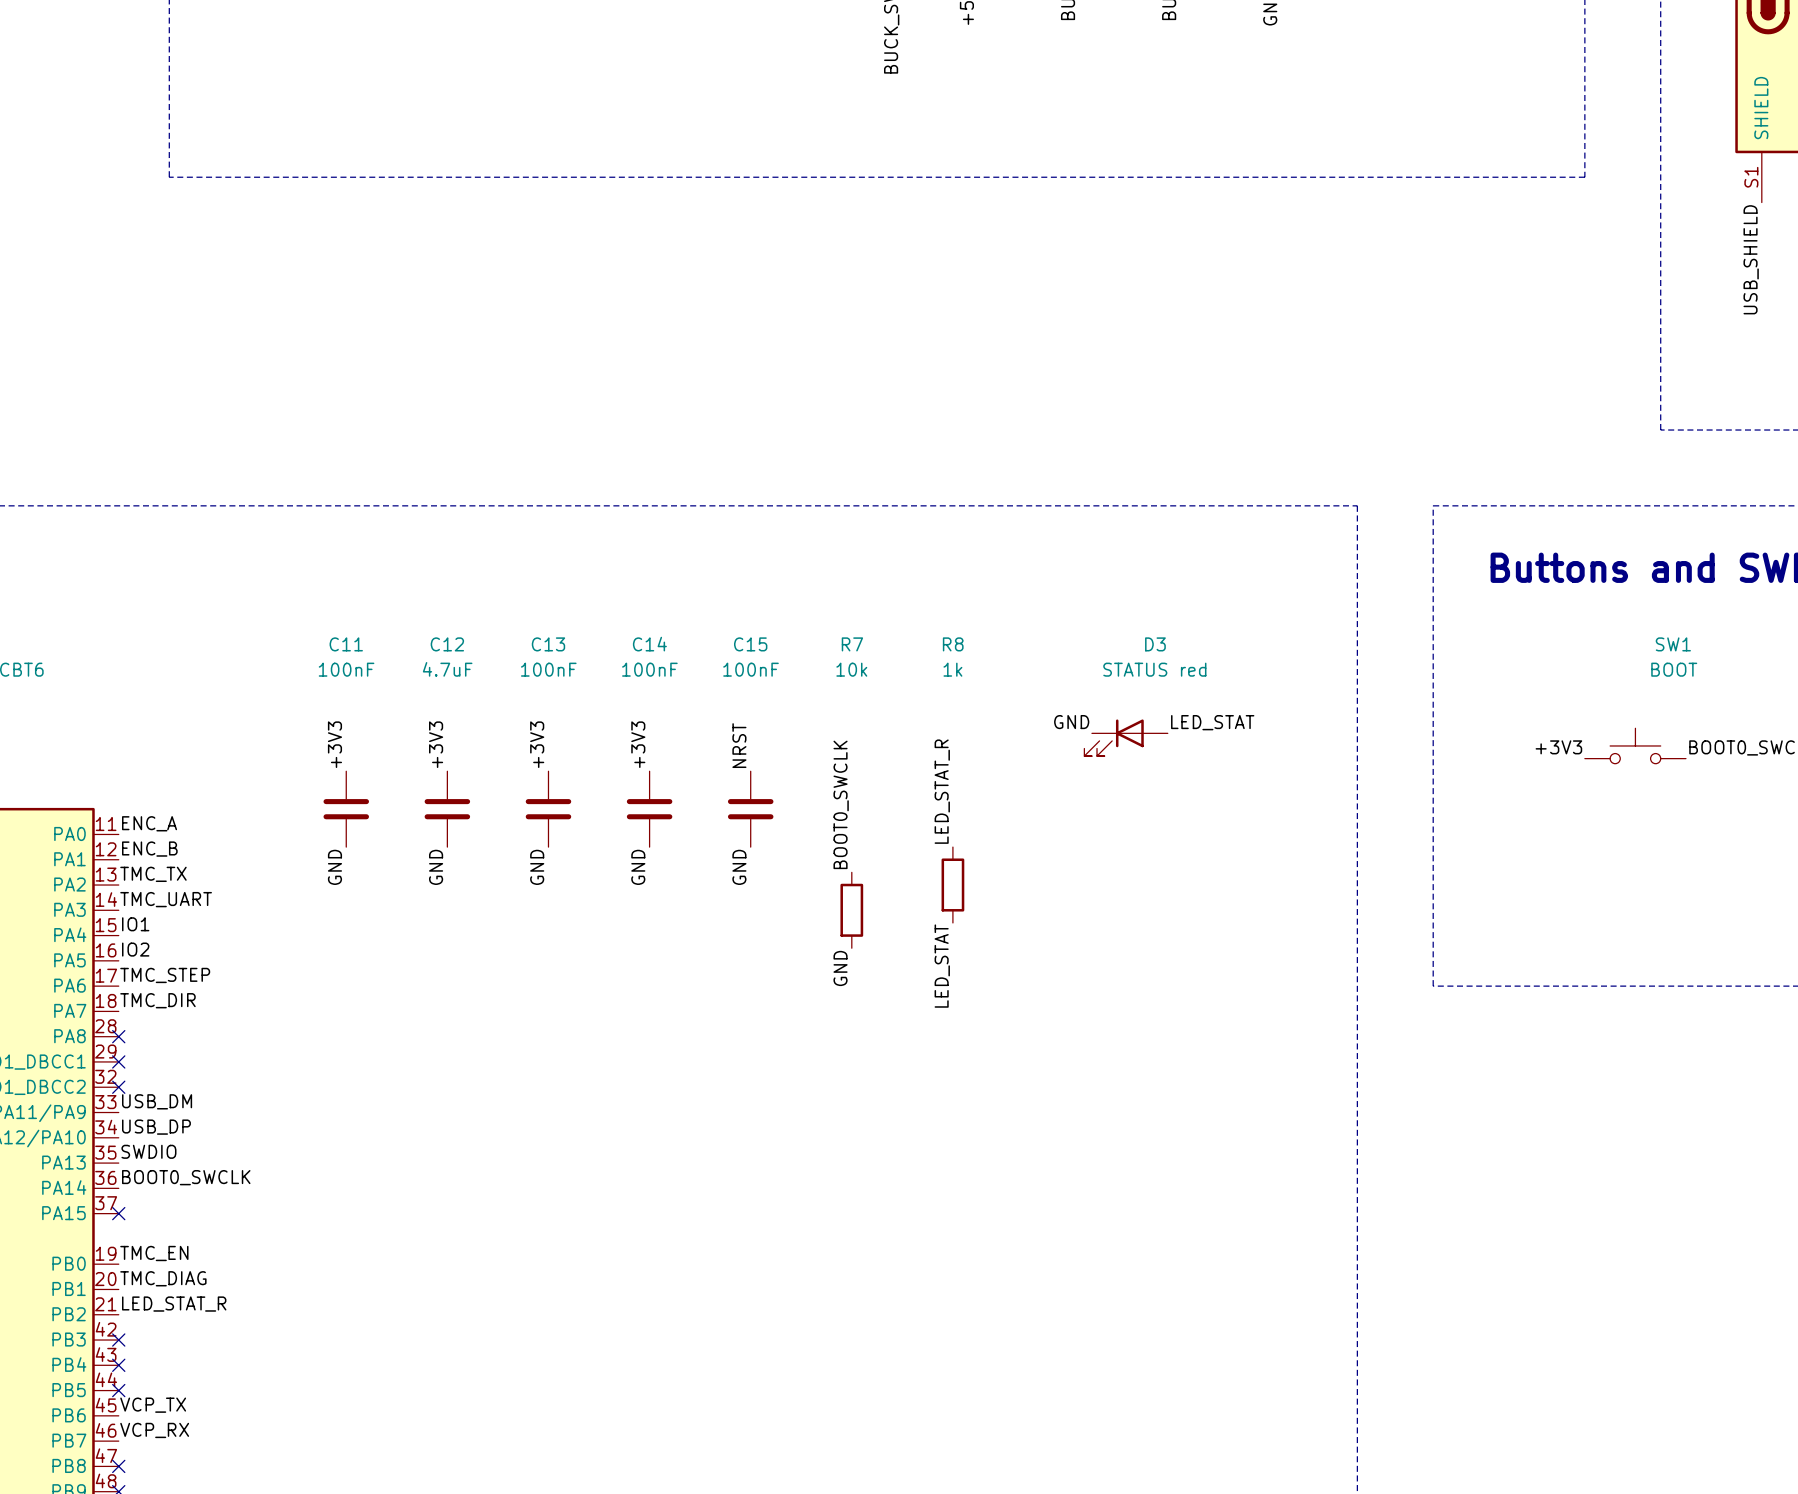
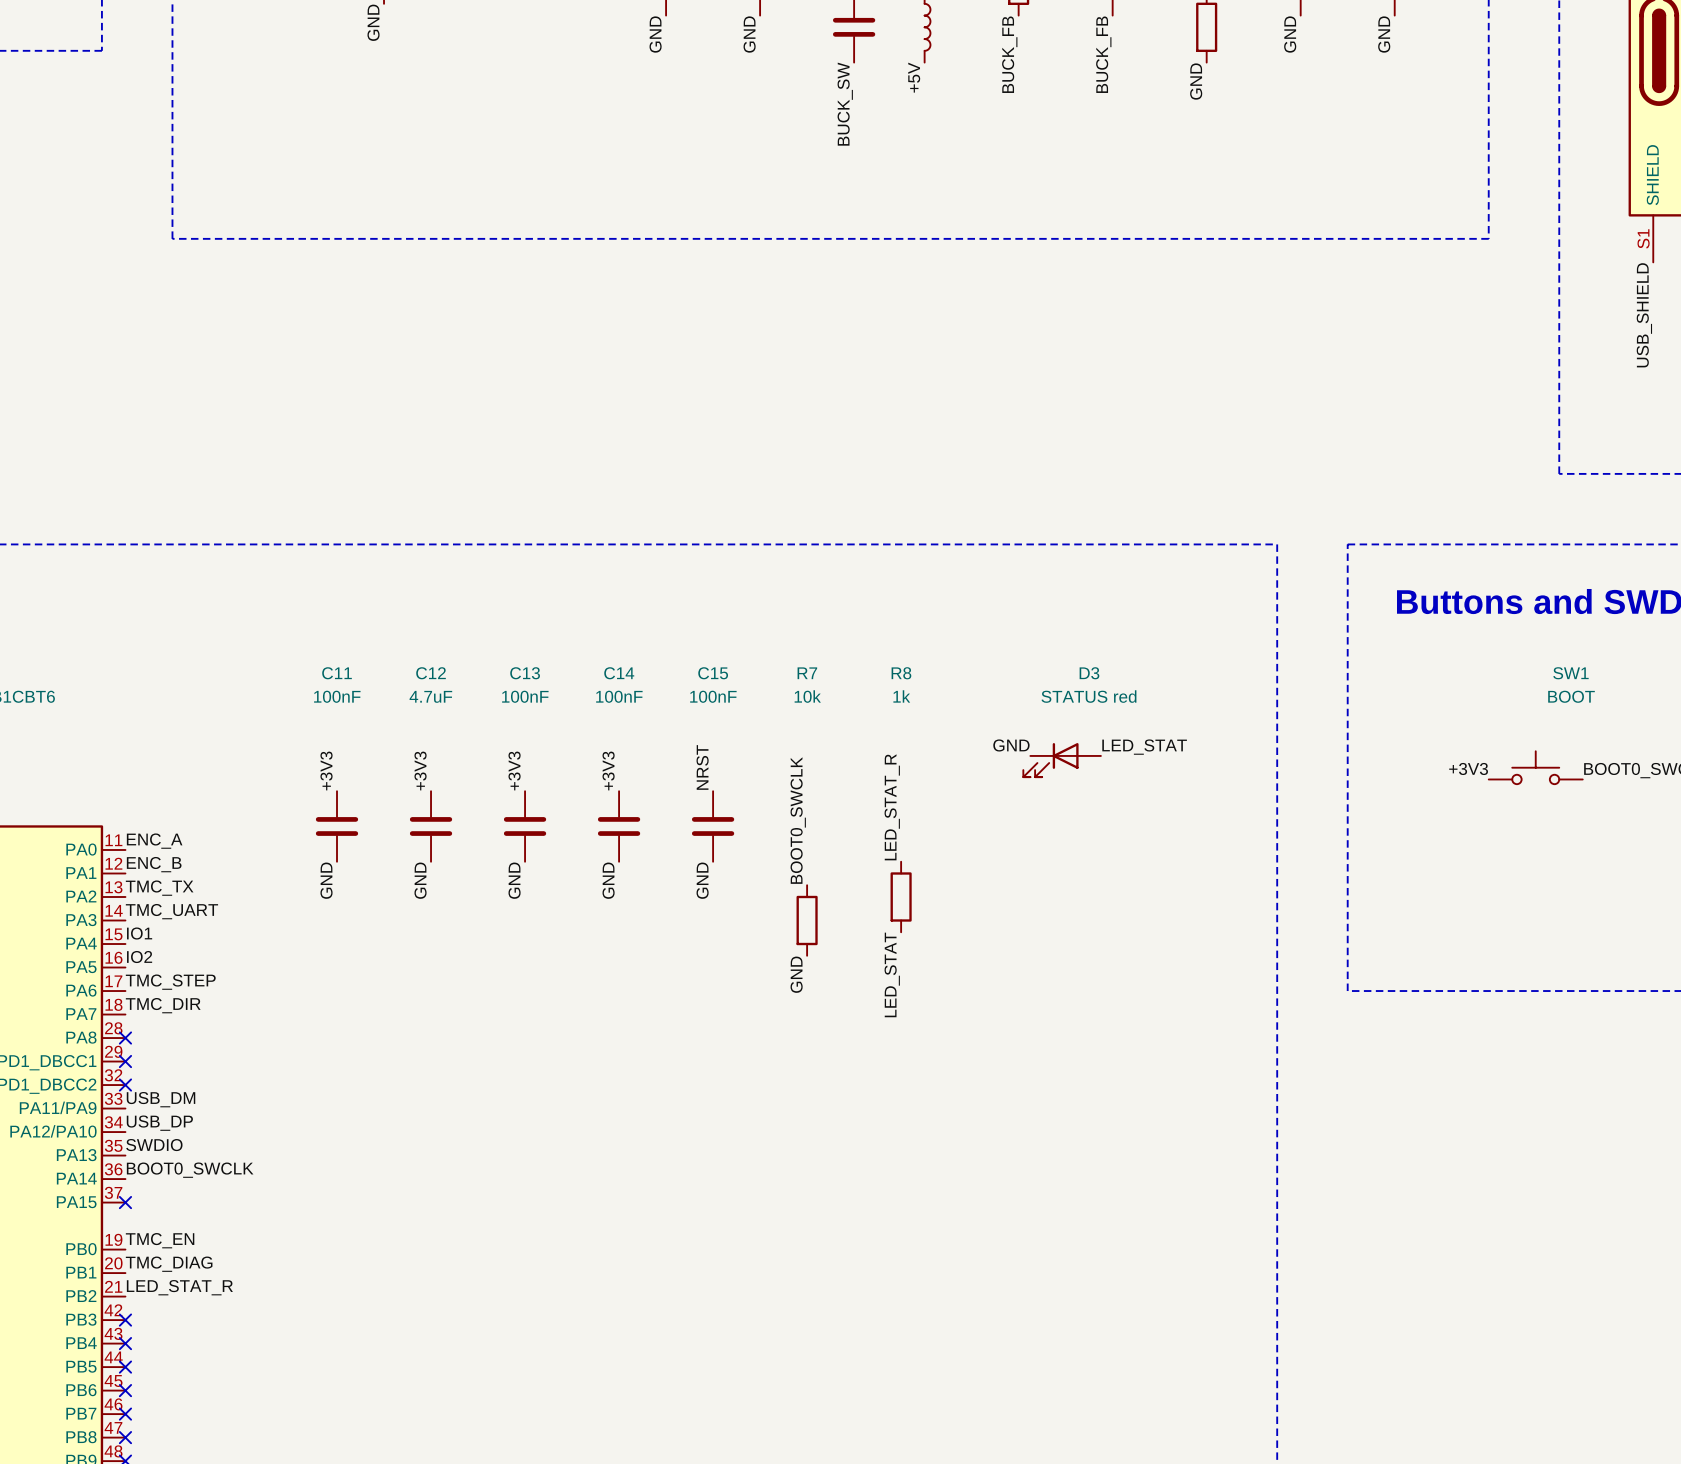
label: VCP_TX (153, 1405) -> none
no-connect mark: none -> (125, 1390)
label: VCP_RX (154, 1430) -> none
no-connect mark: none -> (125, 1414)

